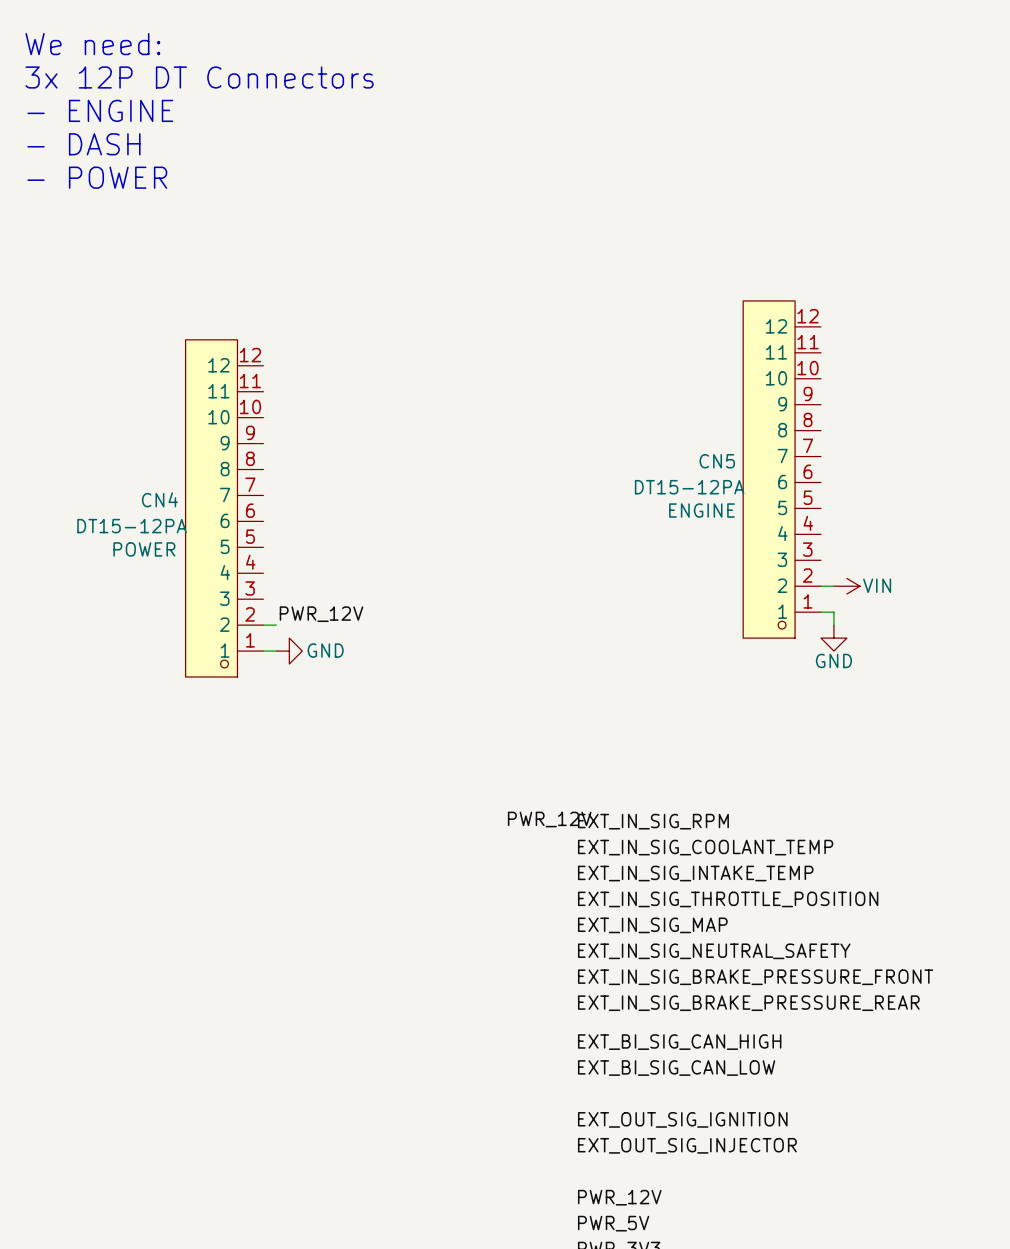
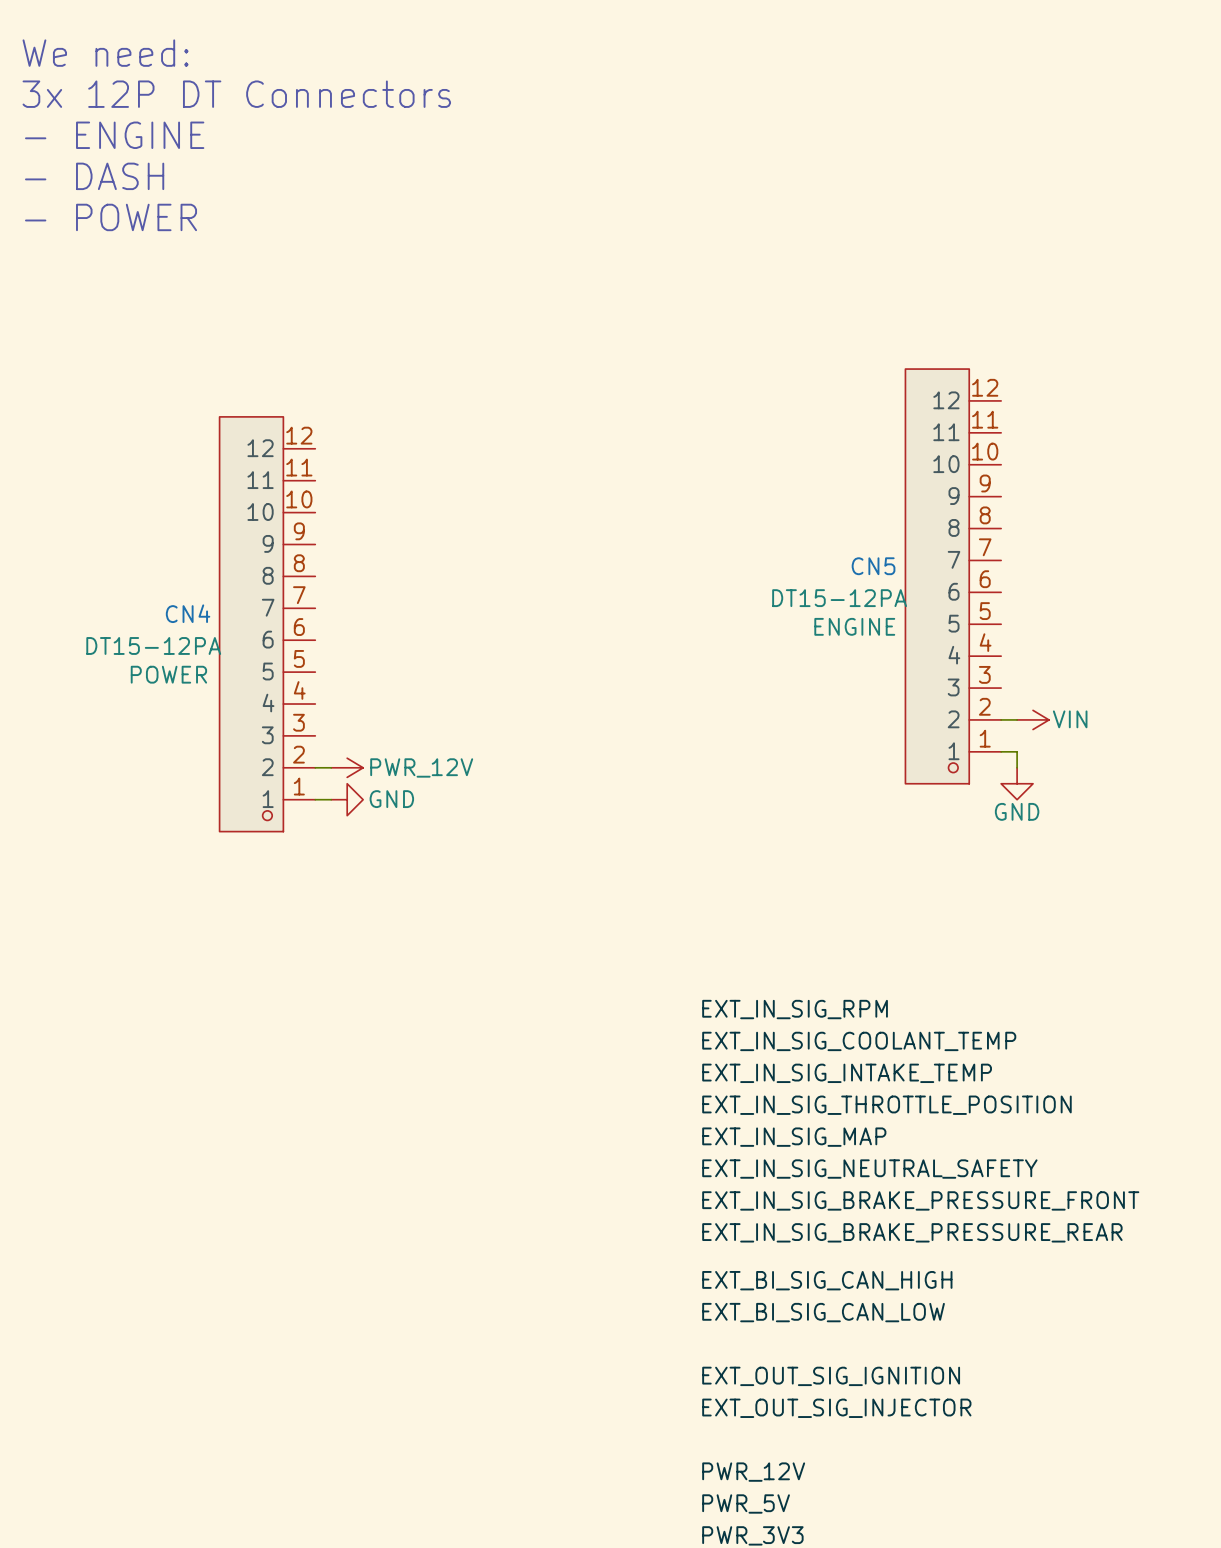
label: PWR_12V (321, 614) -> none
power symbol: none -> PWR_12V (347, 767)
label: PWR_12V (549, 819) -> none

